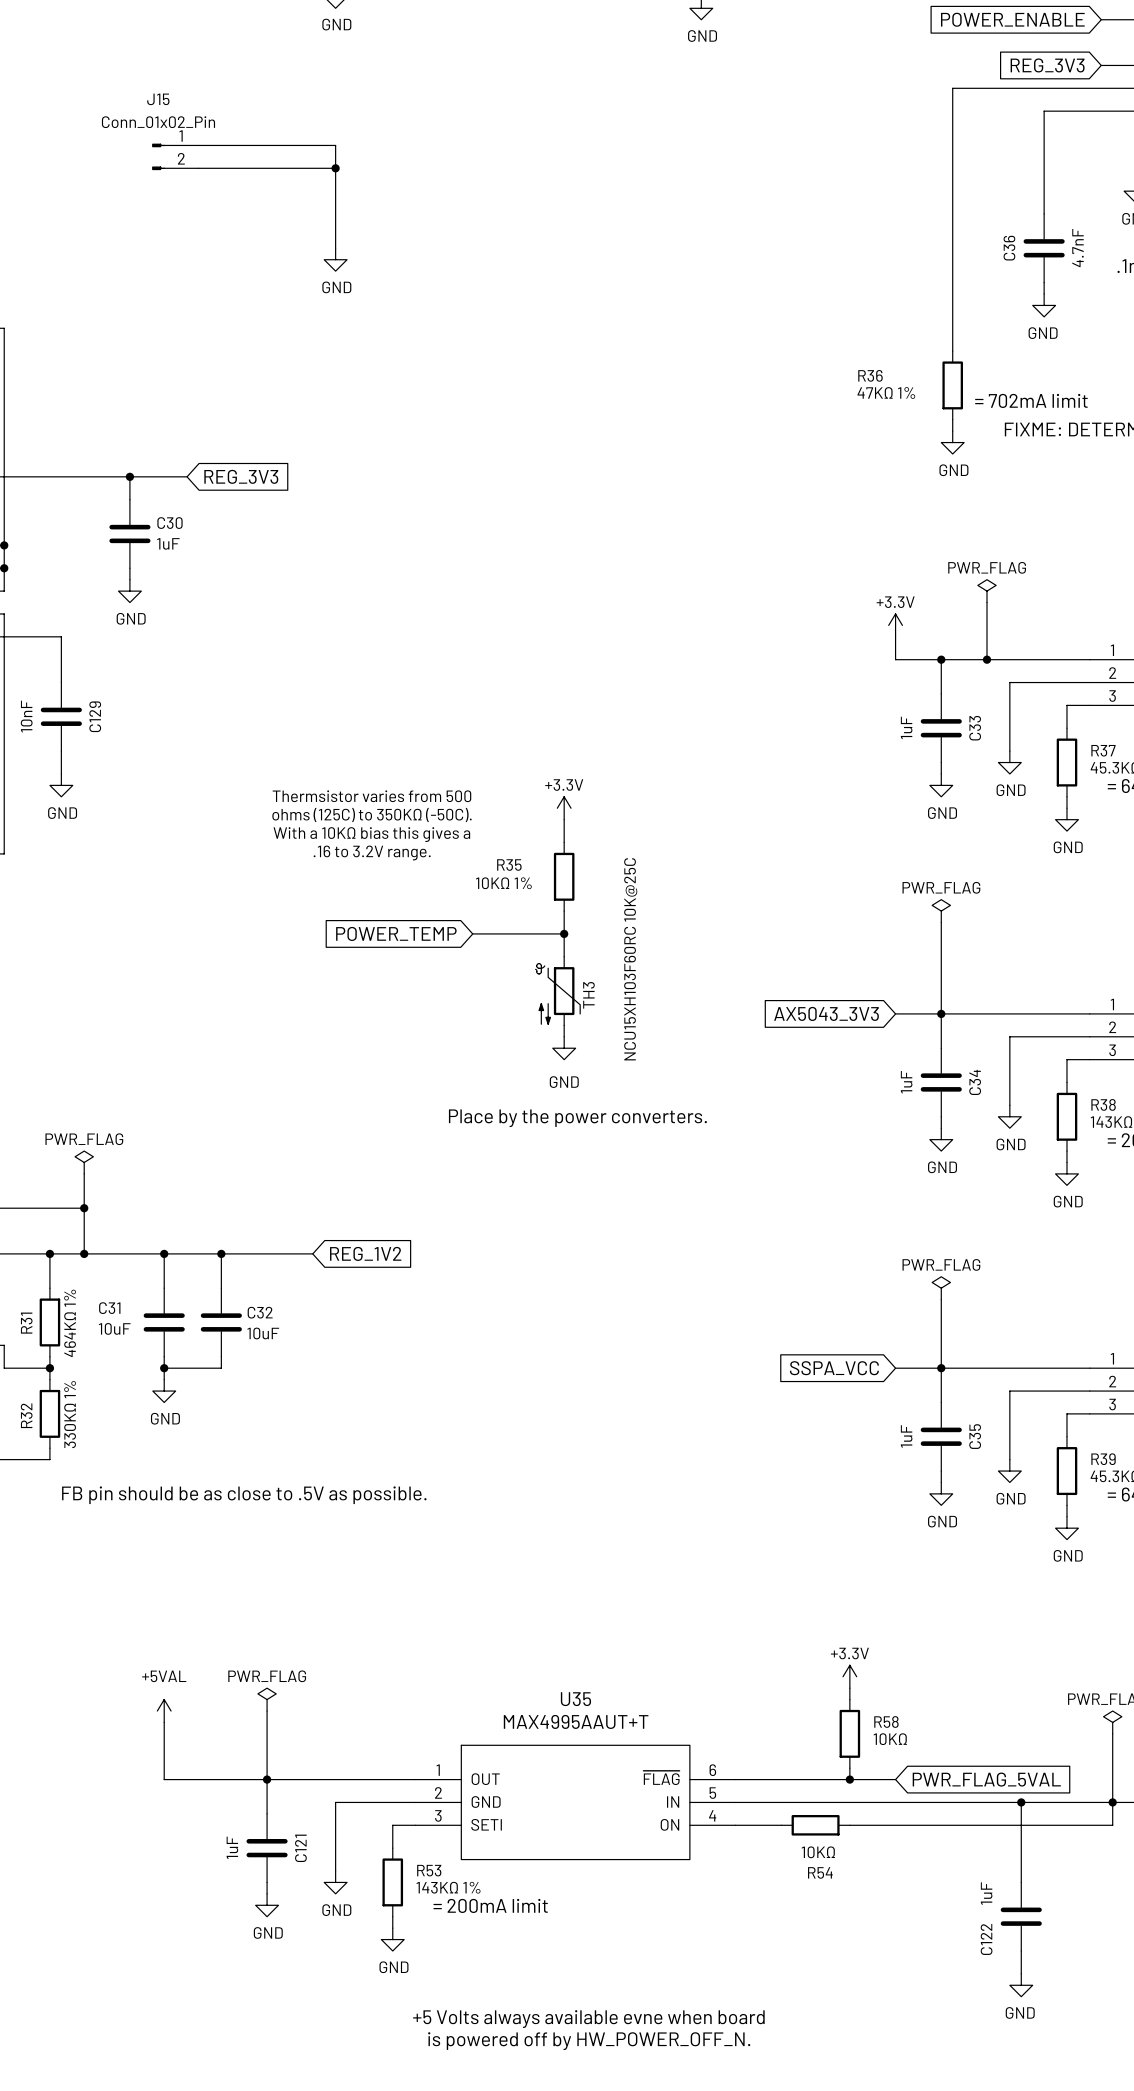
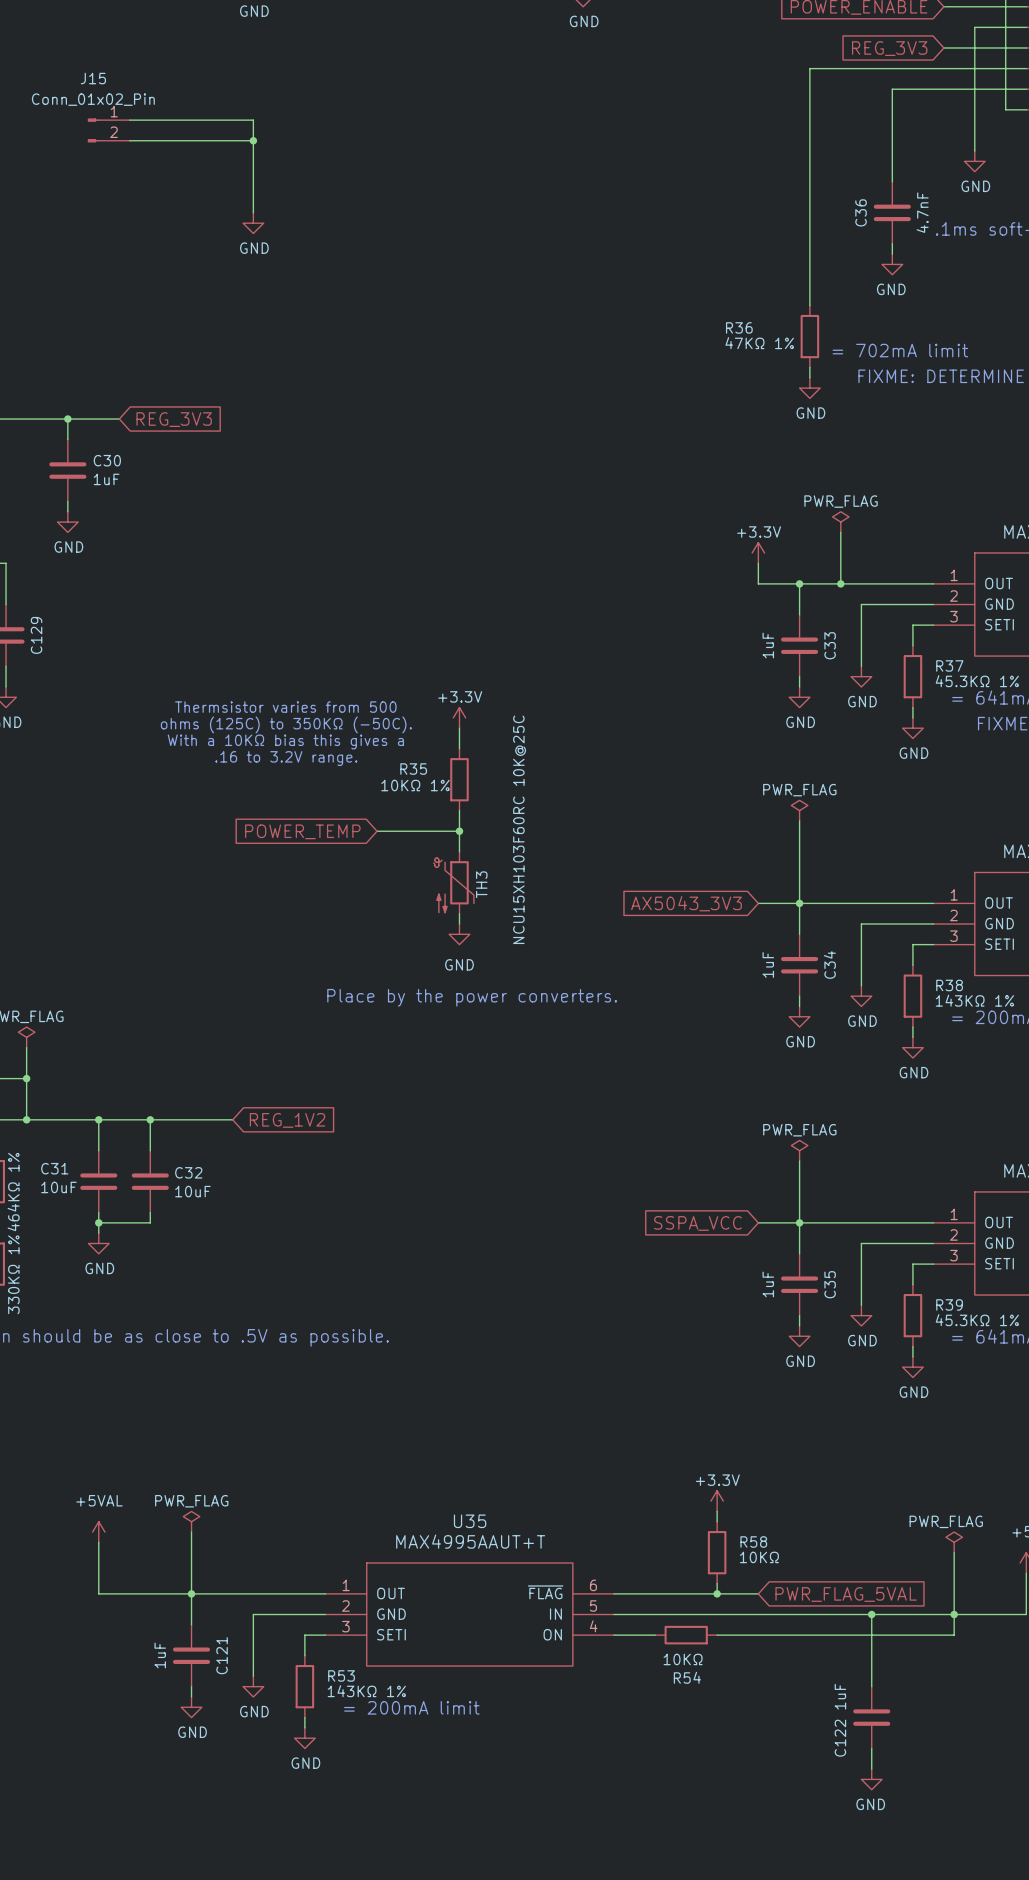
text: +5 Volts always available evne when board (588, 2019) -> none
text: is powered off by HW_POWER_OFF_N. (589, 2041) -> none

